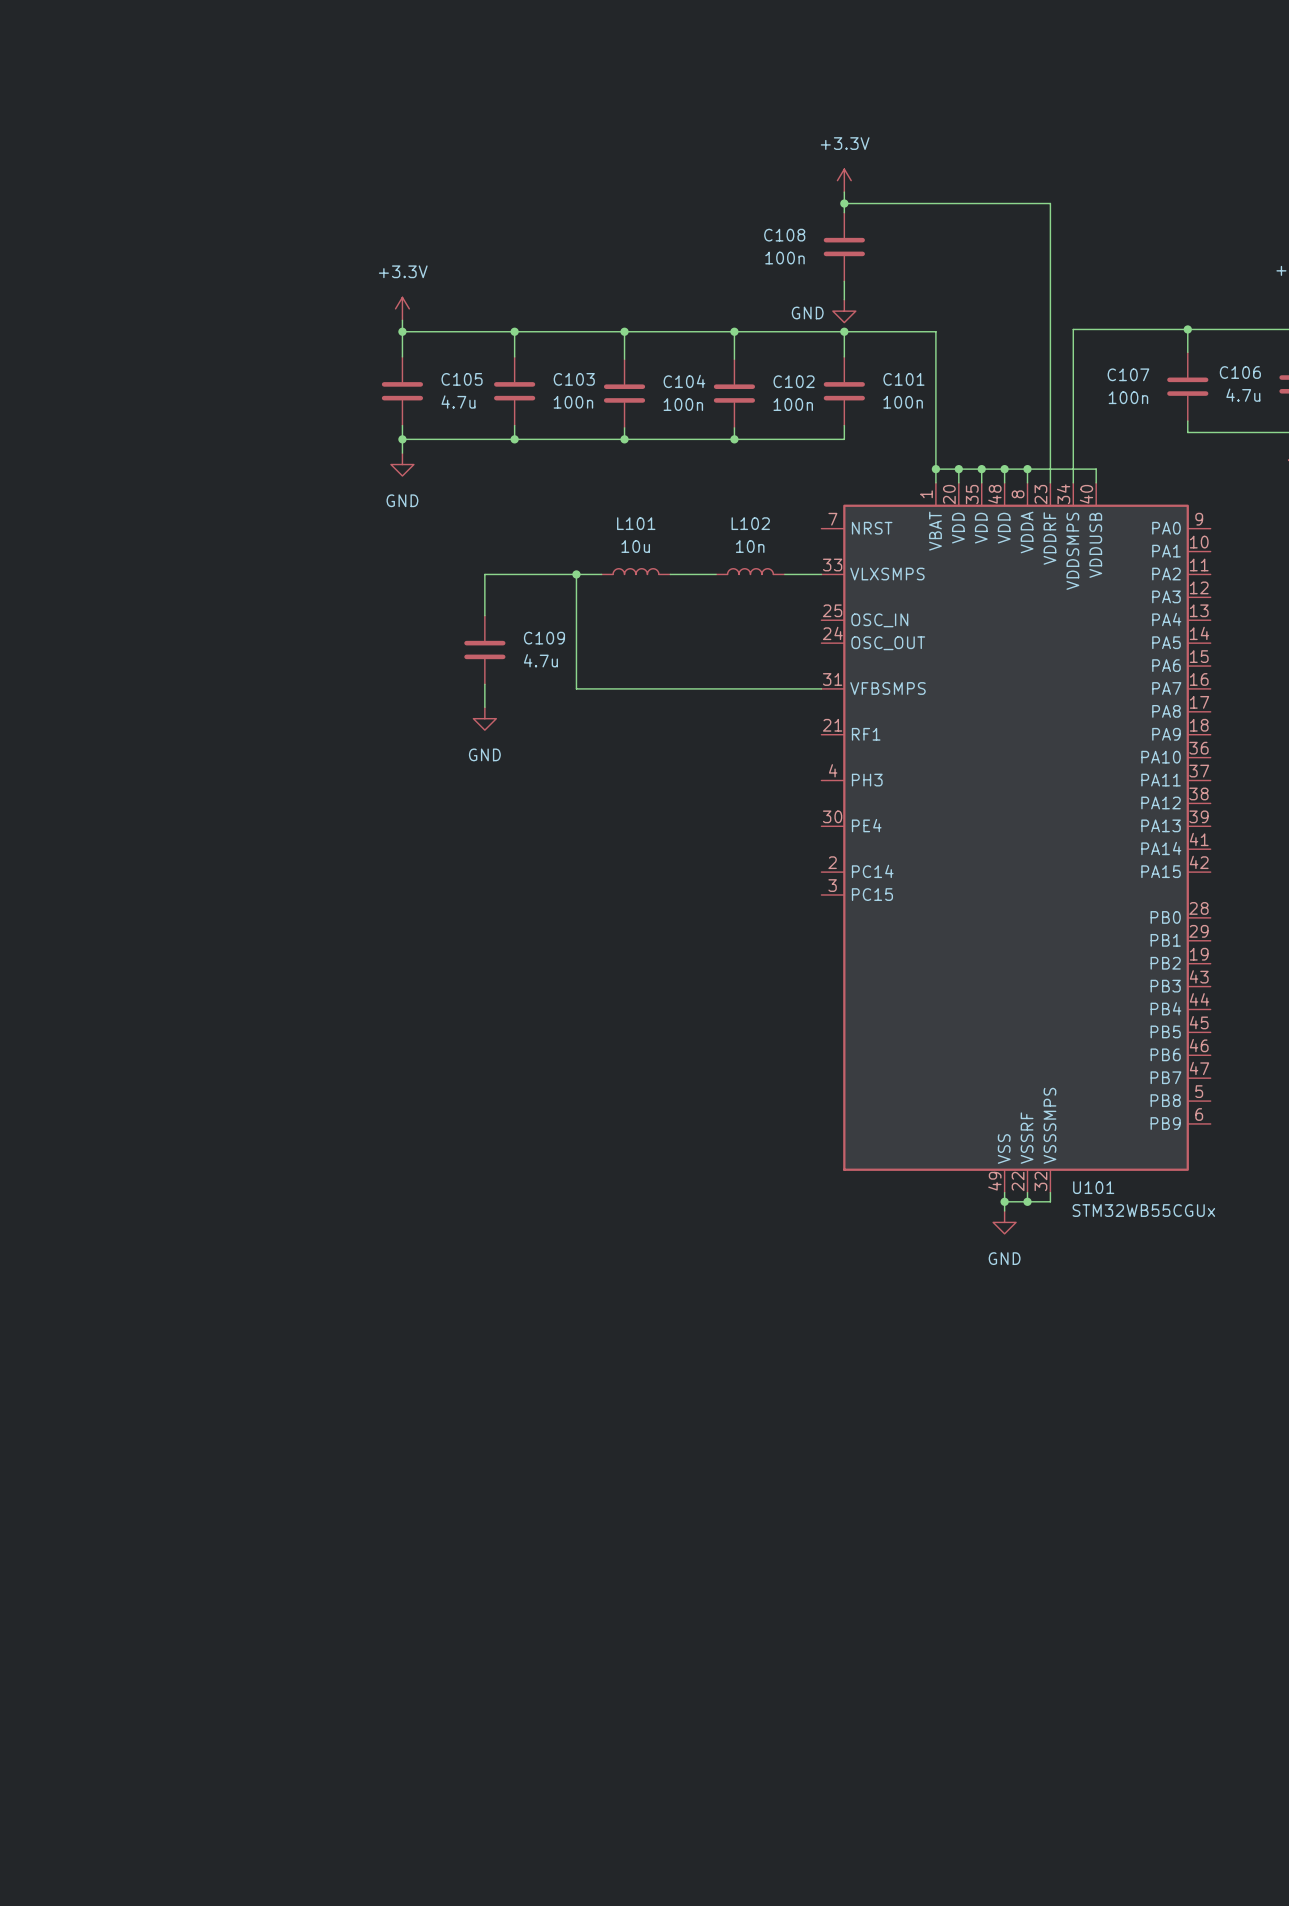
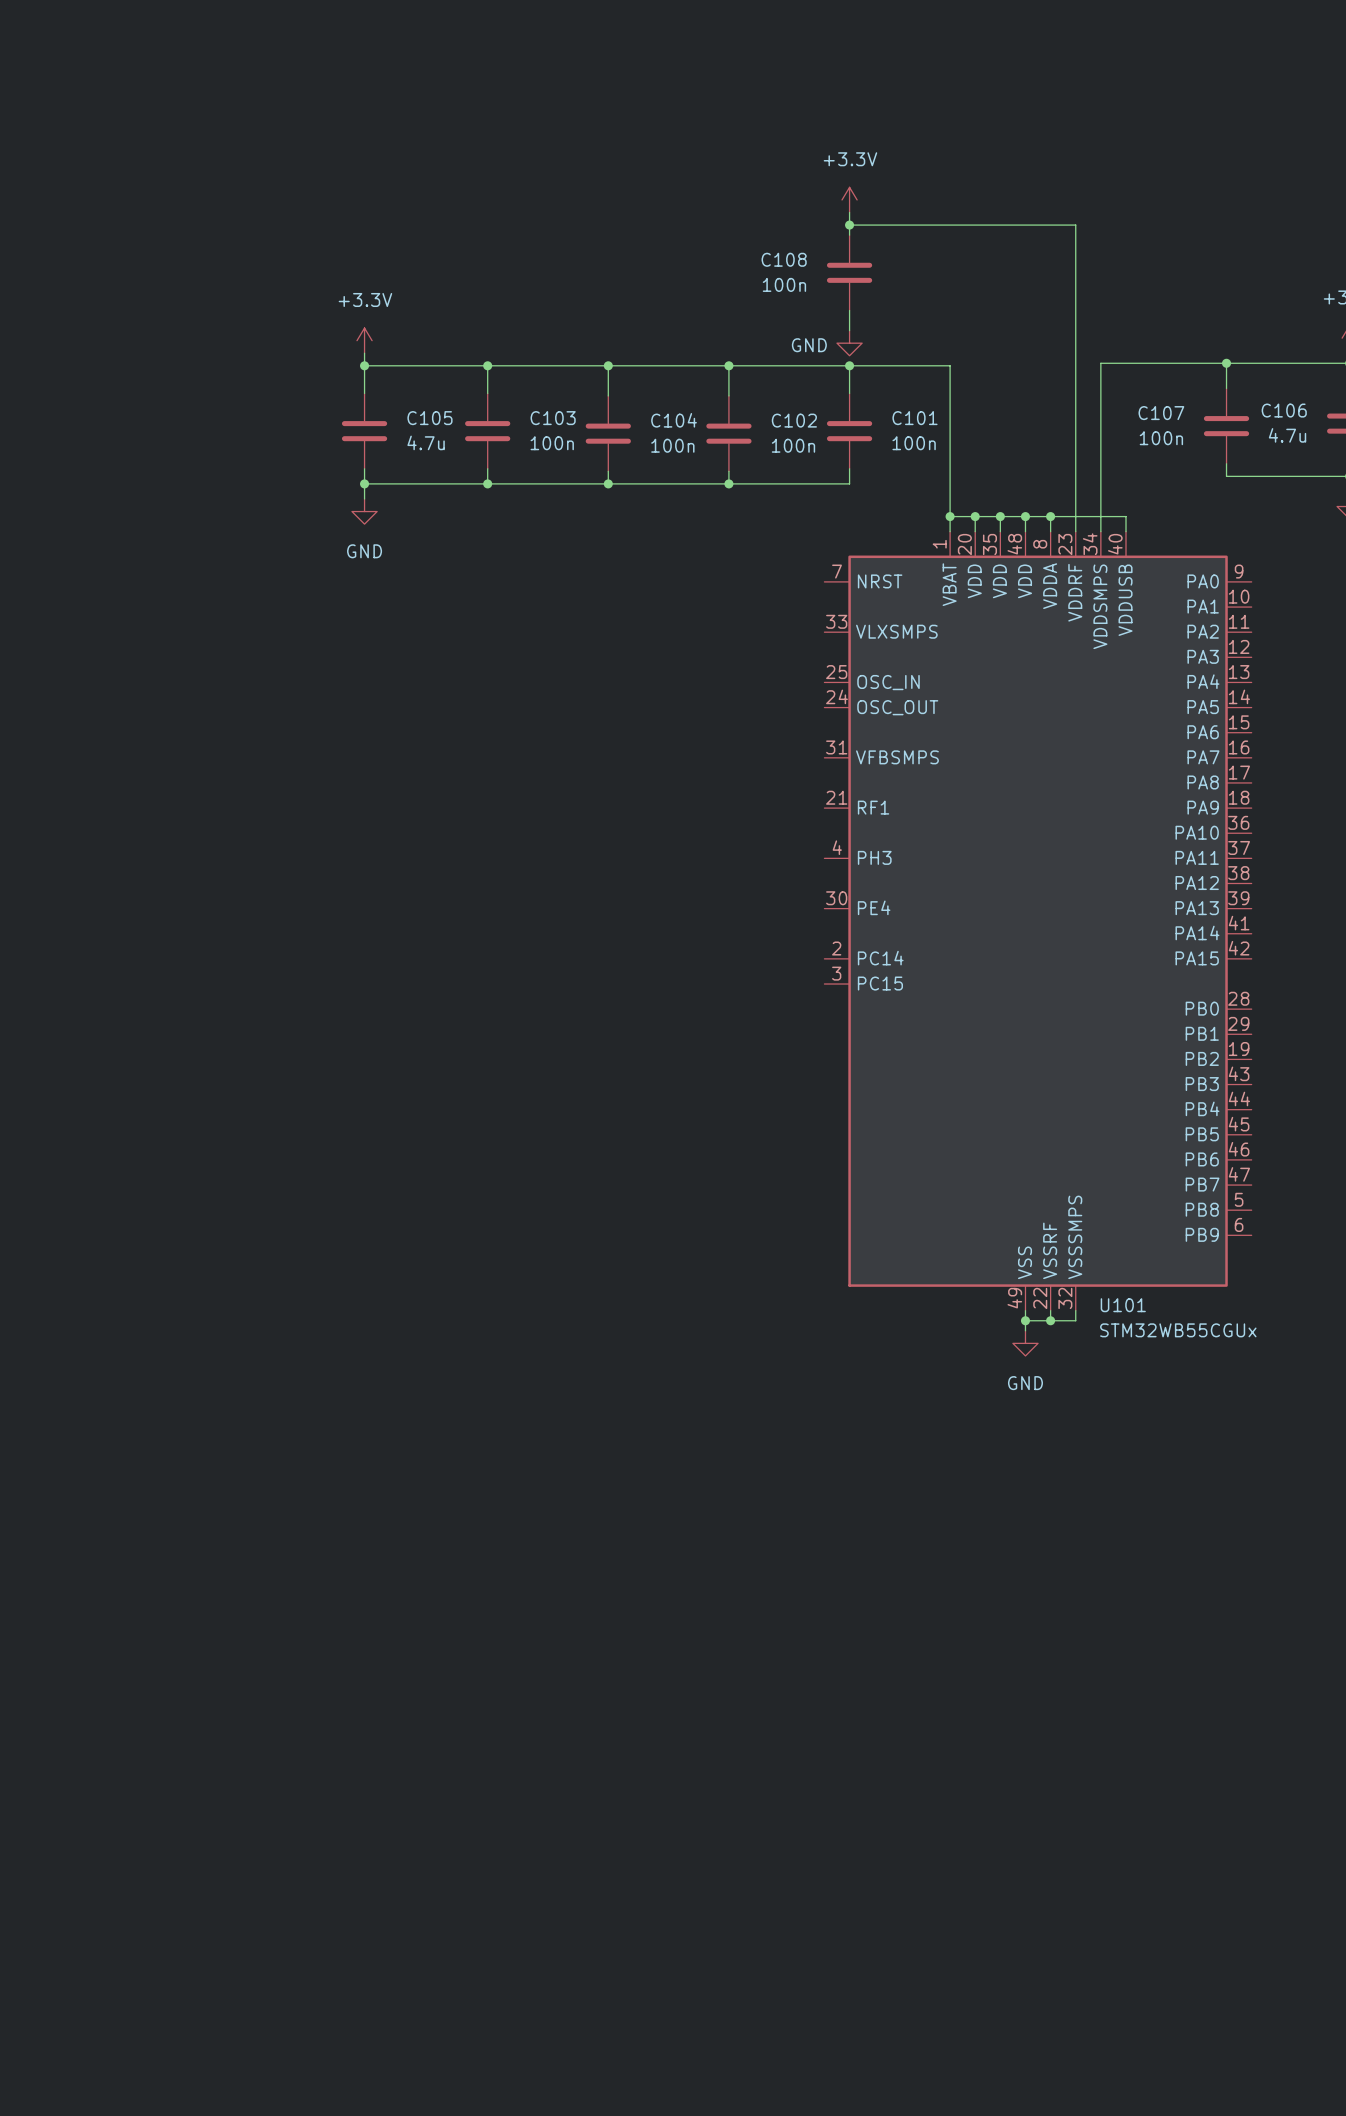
L101: 10u (635, 571) -> none
L102: 10n (750, 571) -> none
wire: (576, 574) (576, 688) (821, 688) -> none
junction: (576, 574) -> none
wire: (601, 574) (484, 574) (484, 615) -> none
wire: (670, 574) (716, 574) -> none
wire: (784, 574) (821, 574) -> none
C109: 4.7u (484, 650) -> none
wire: (484, 684) (484, 707) -> none
power symbol: GND (484, 718) -> none

